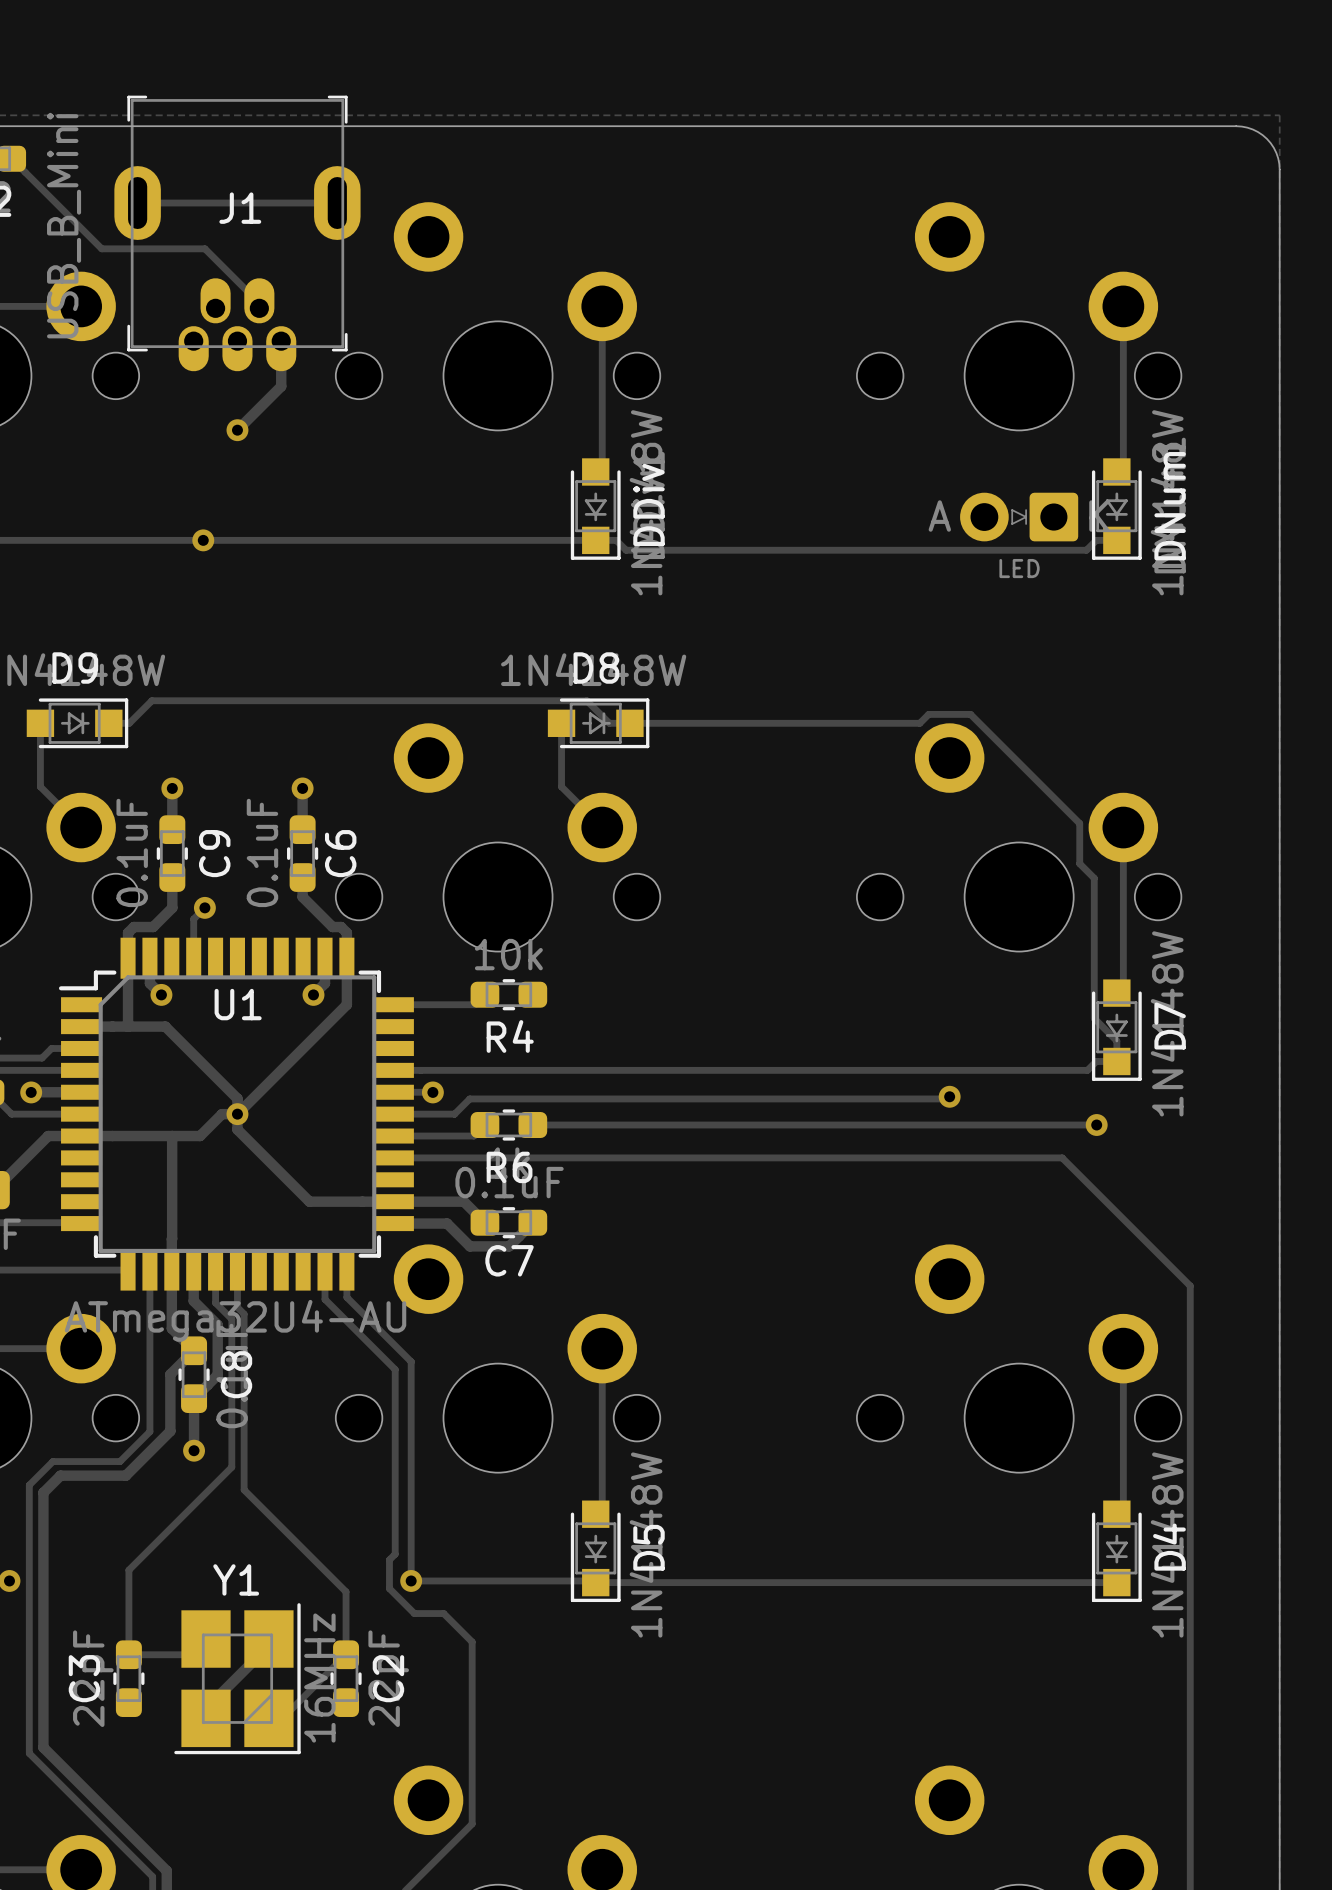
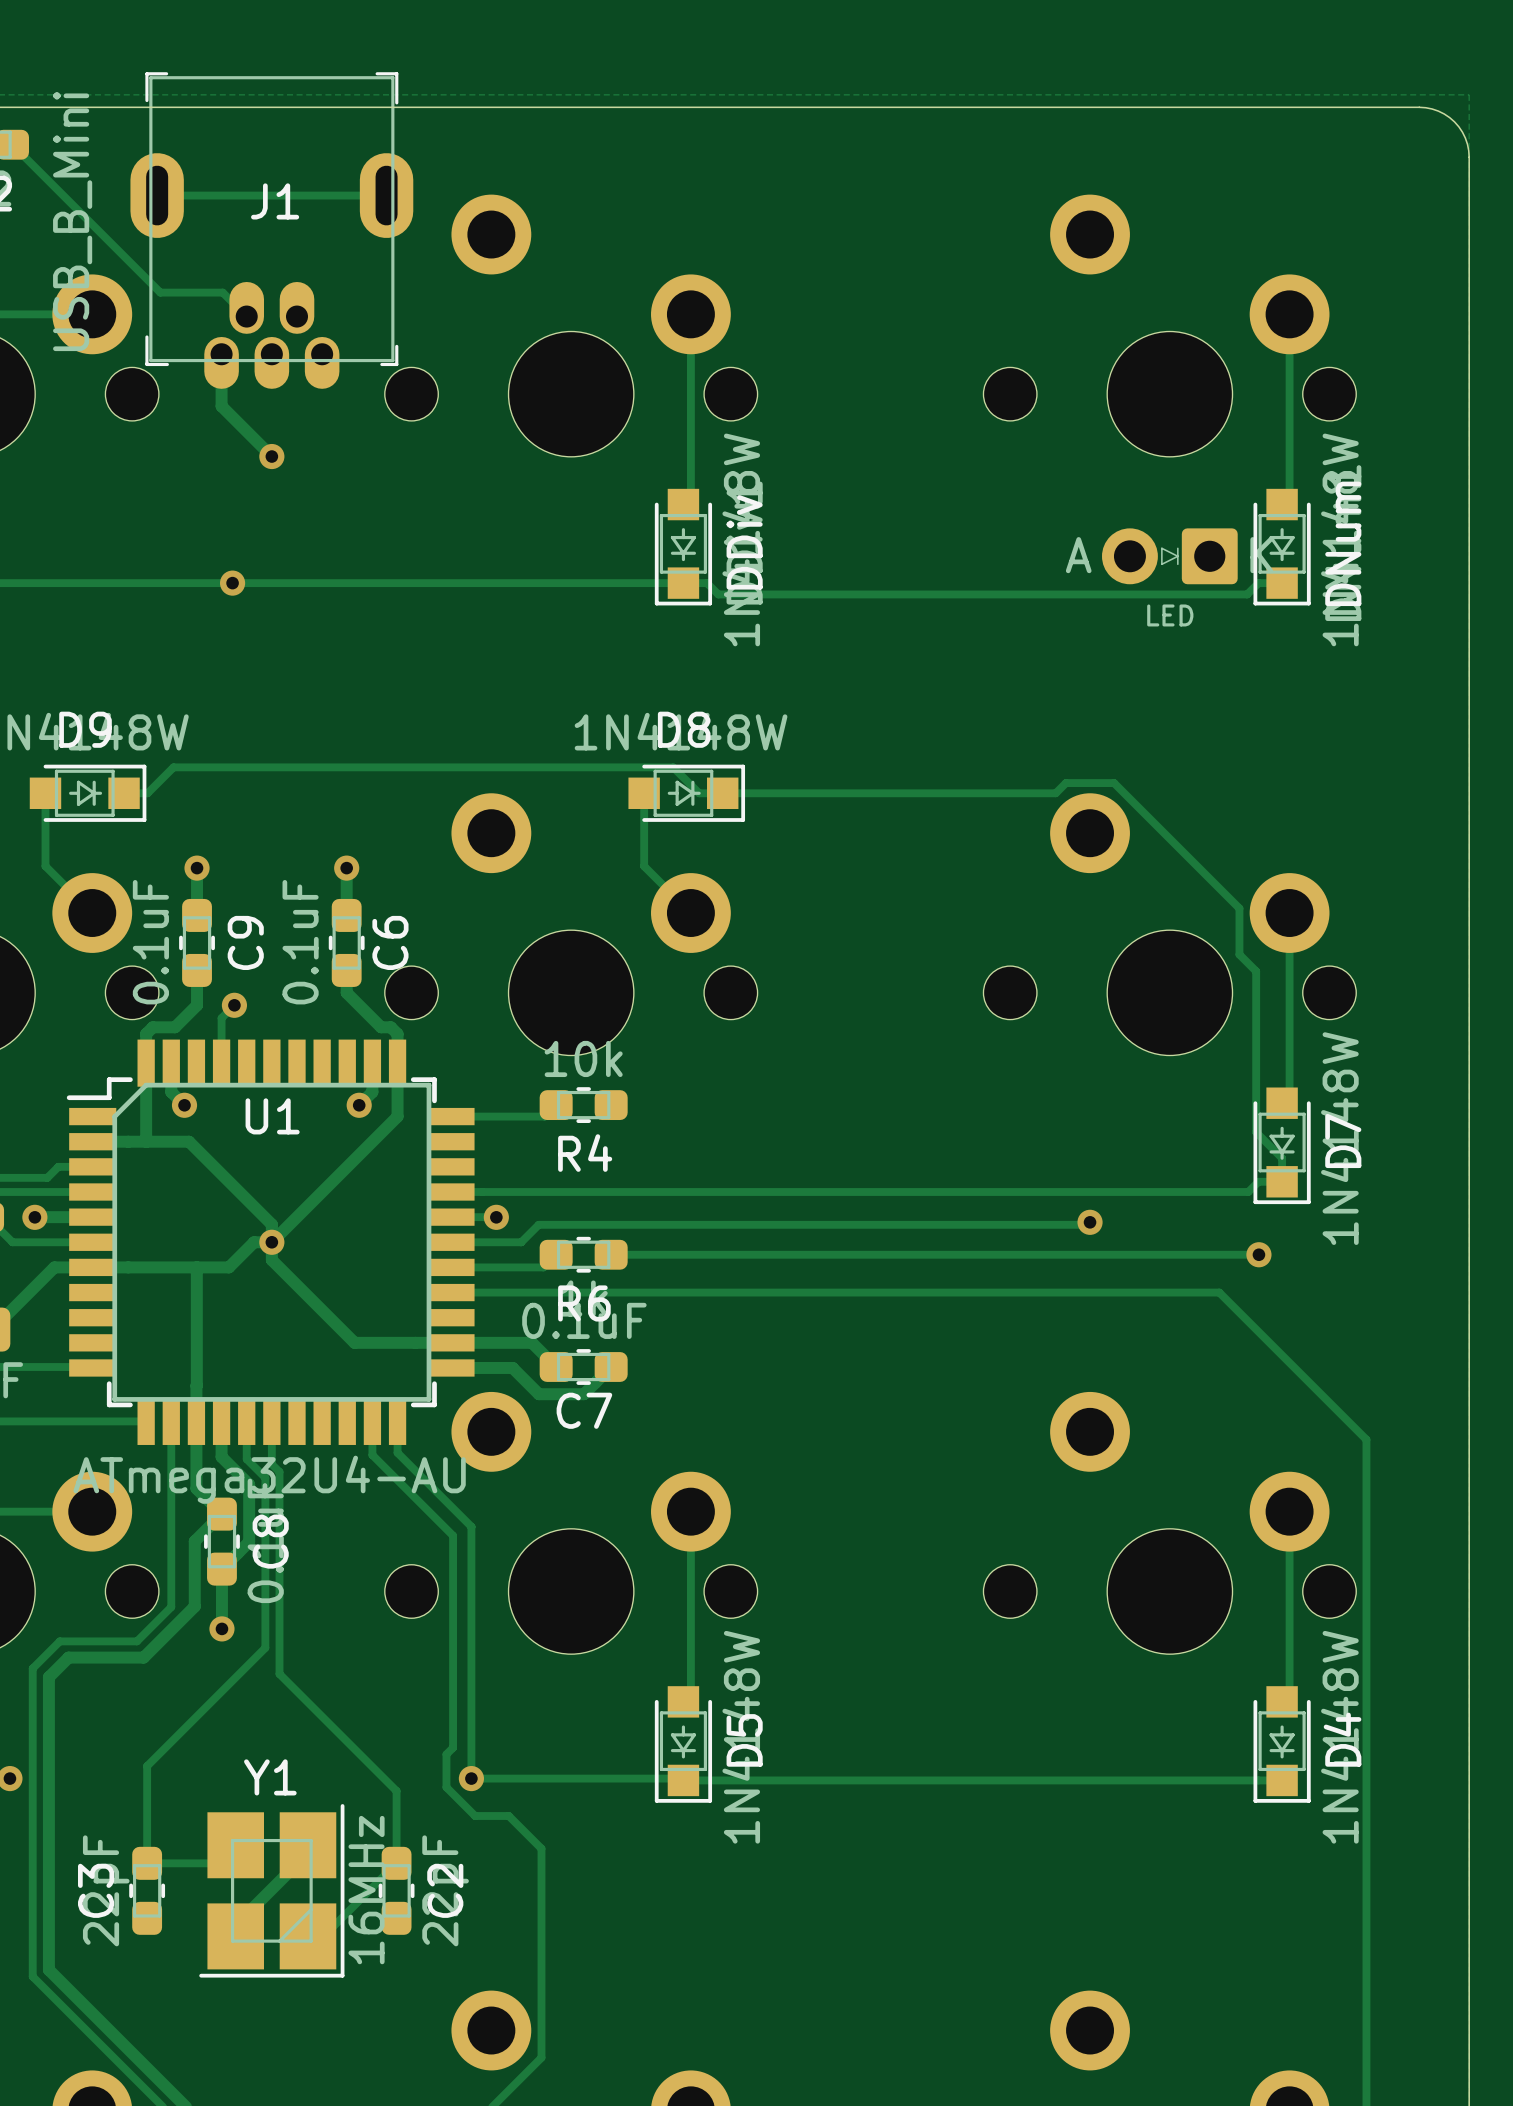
track: (101, 248) (204, 248) (259, 303) (259, 308) -> (115, 248) (160, 292) (222, 292) (246, 316)
track: (281, 341) (281, 386) (237, 430) -> (221, 354) (221, 406) (271, 456)

